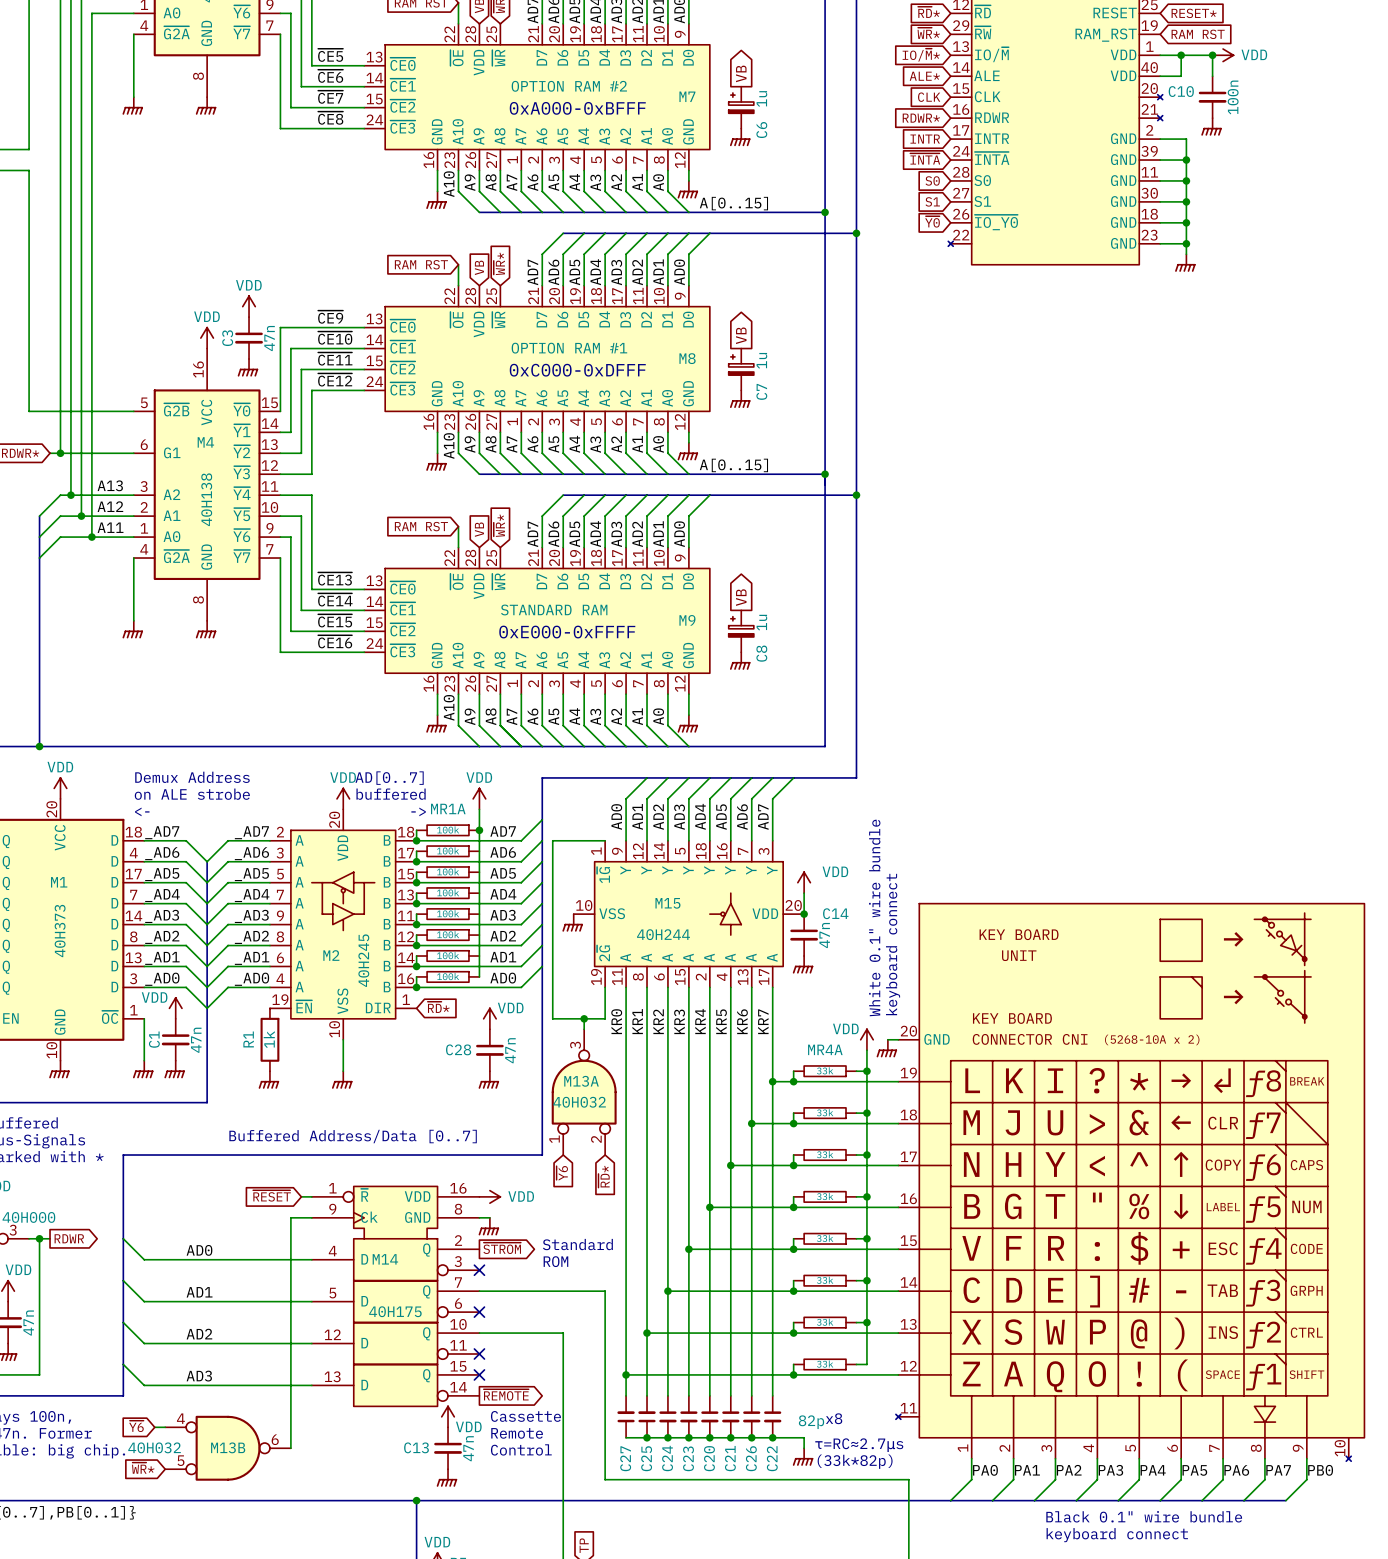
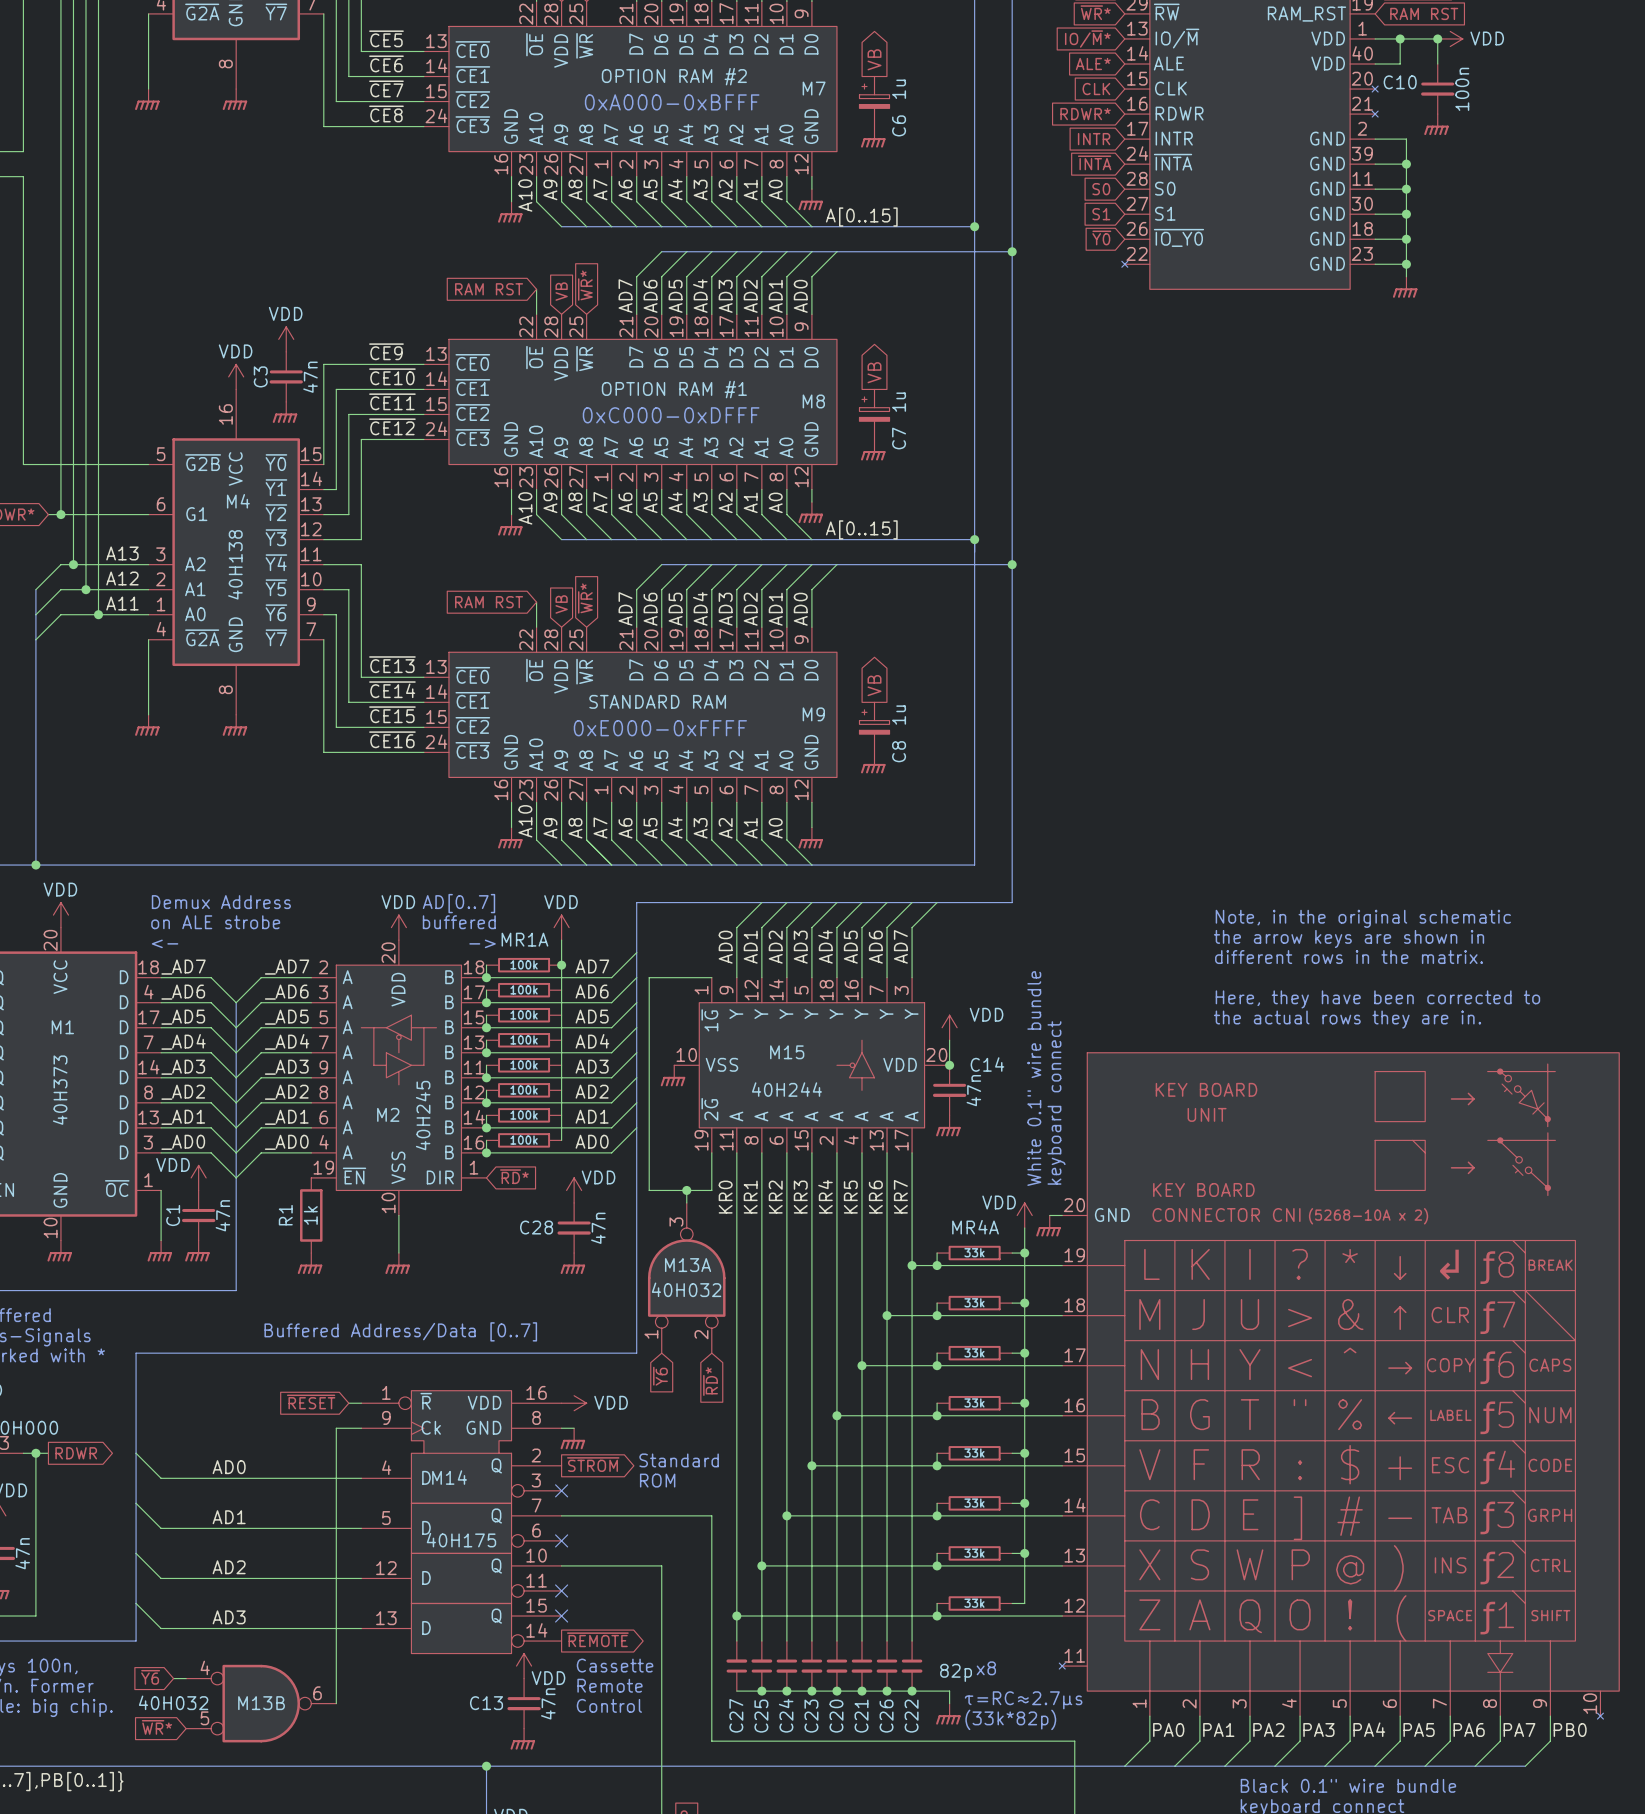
text: none -> Note, in the original schematic (1363, 918)
text: none -> the arrow keys are shown in (1349, 938)
text: none -> different rows in the matrix. (1349, 957)
text: none -> Here, they have been corrected to (1377, 999)
text: none -> the actual rows they are in. (1347, 1019)
part text: → (1181, 1080) -> ↓ (1400, 1267)
part text: ← (1181, 1122) -> ↑ (1400, 1318)
part text: ↑ (1181, 1164) -> → (1400, 1368)
part text: ↓ (1181, 1206) -> ← (1400, 1418)

